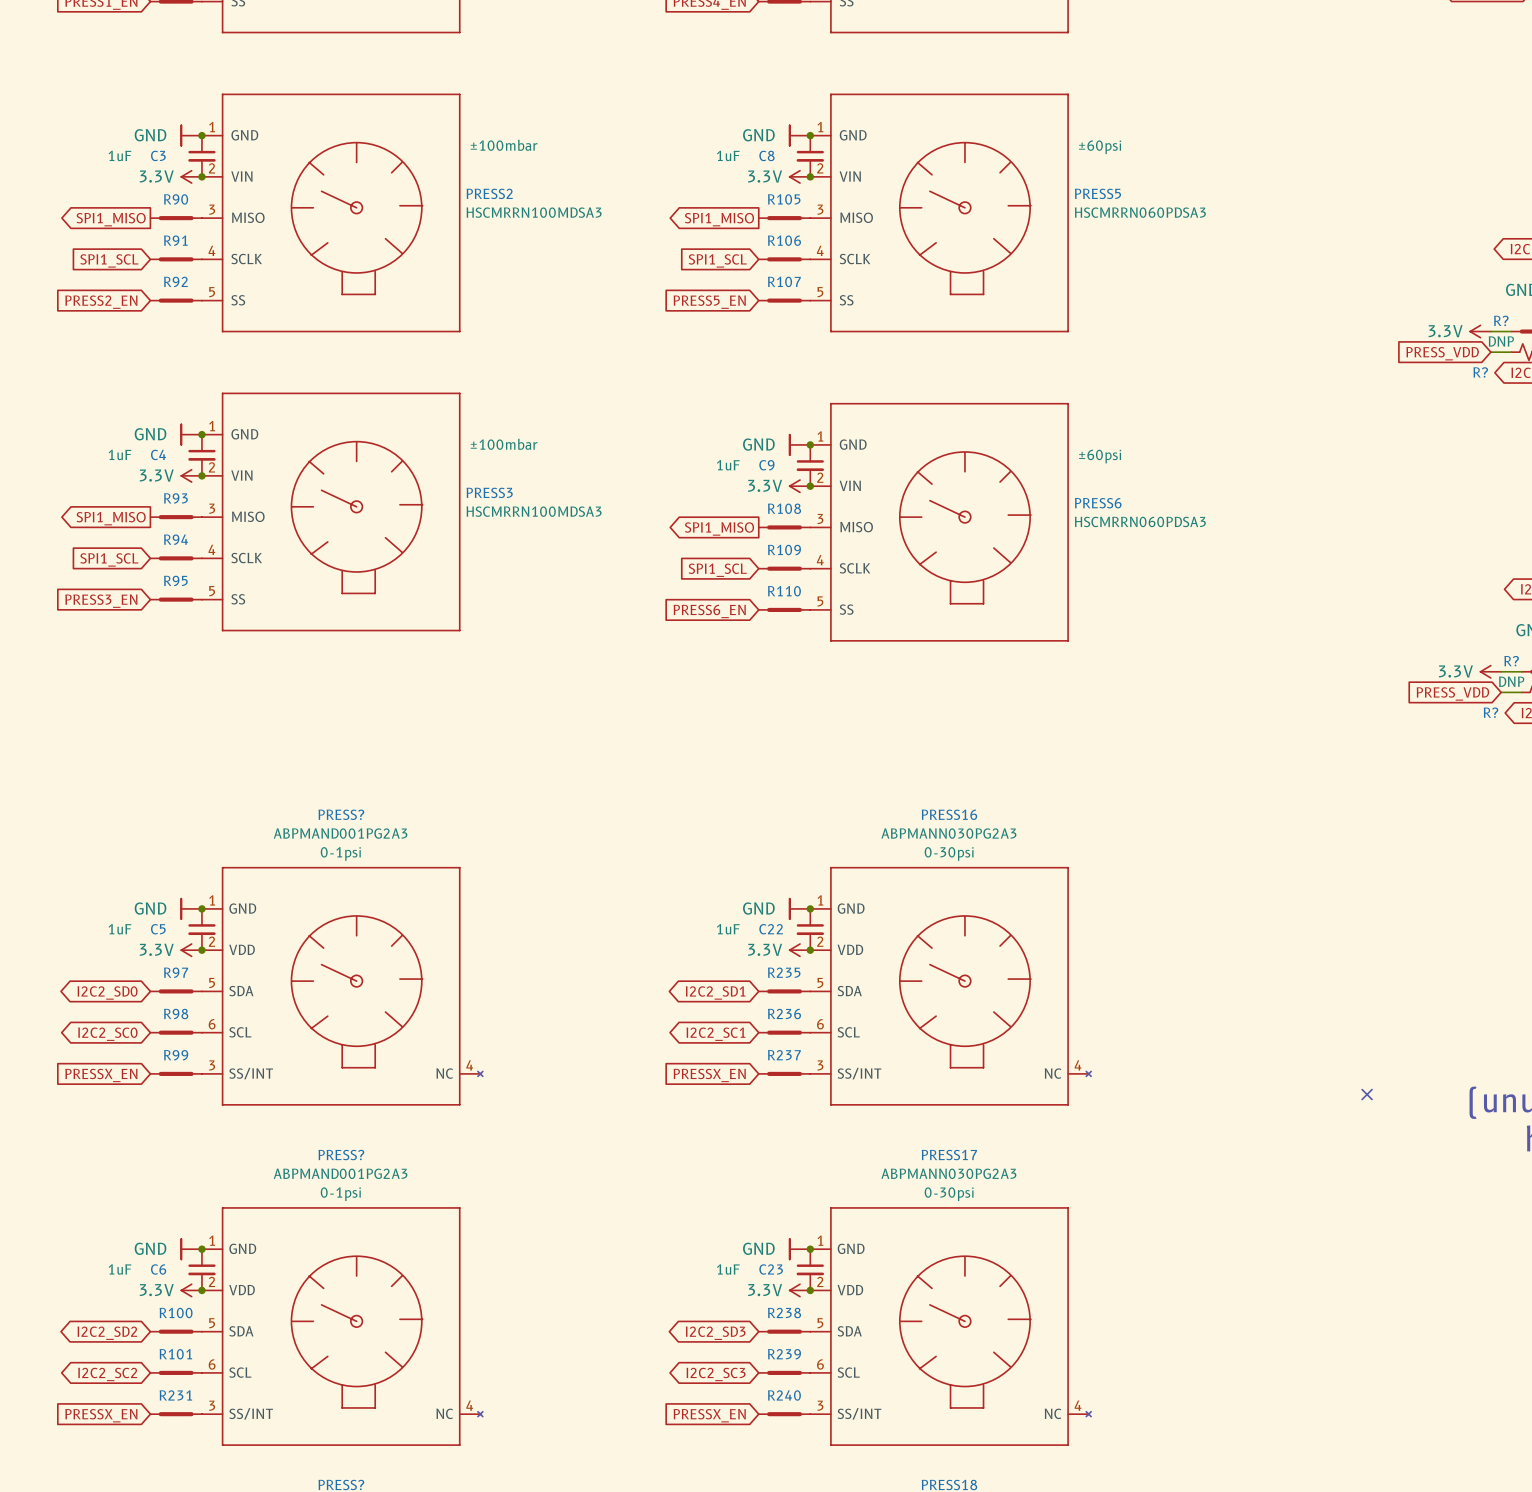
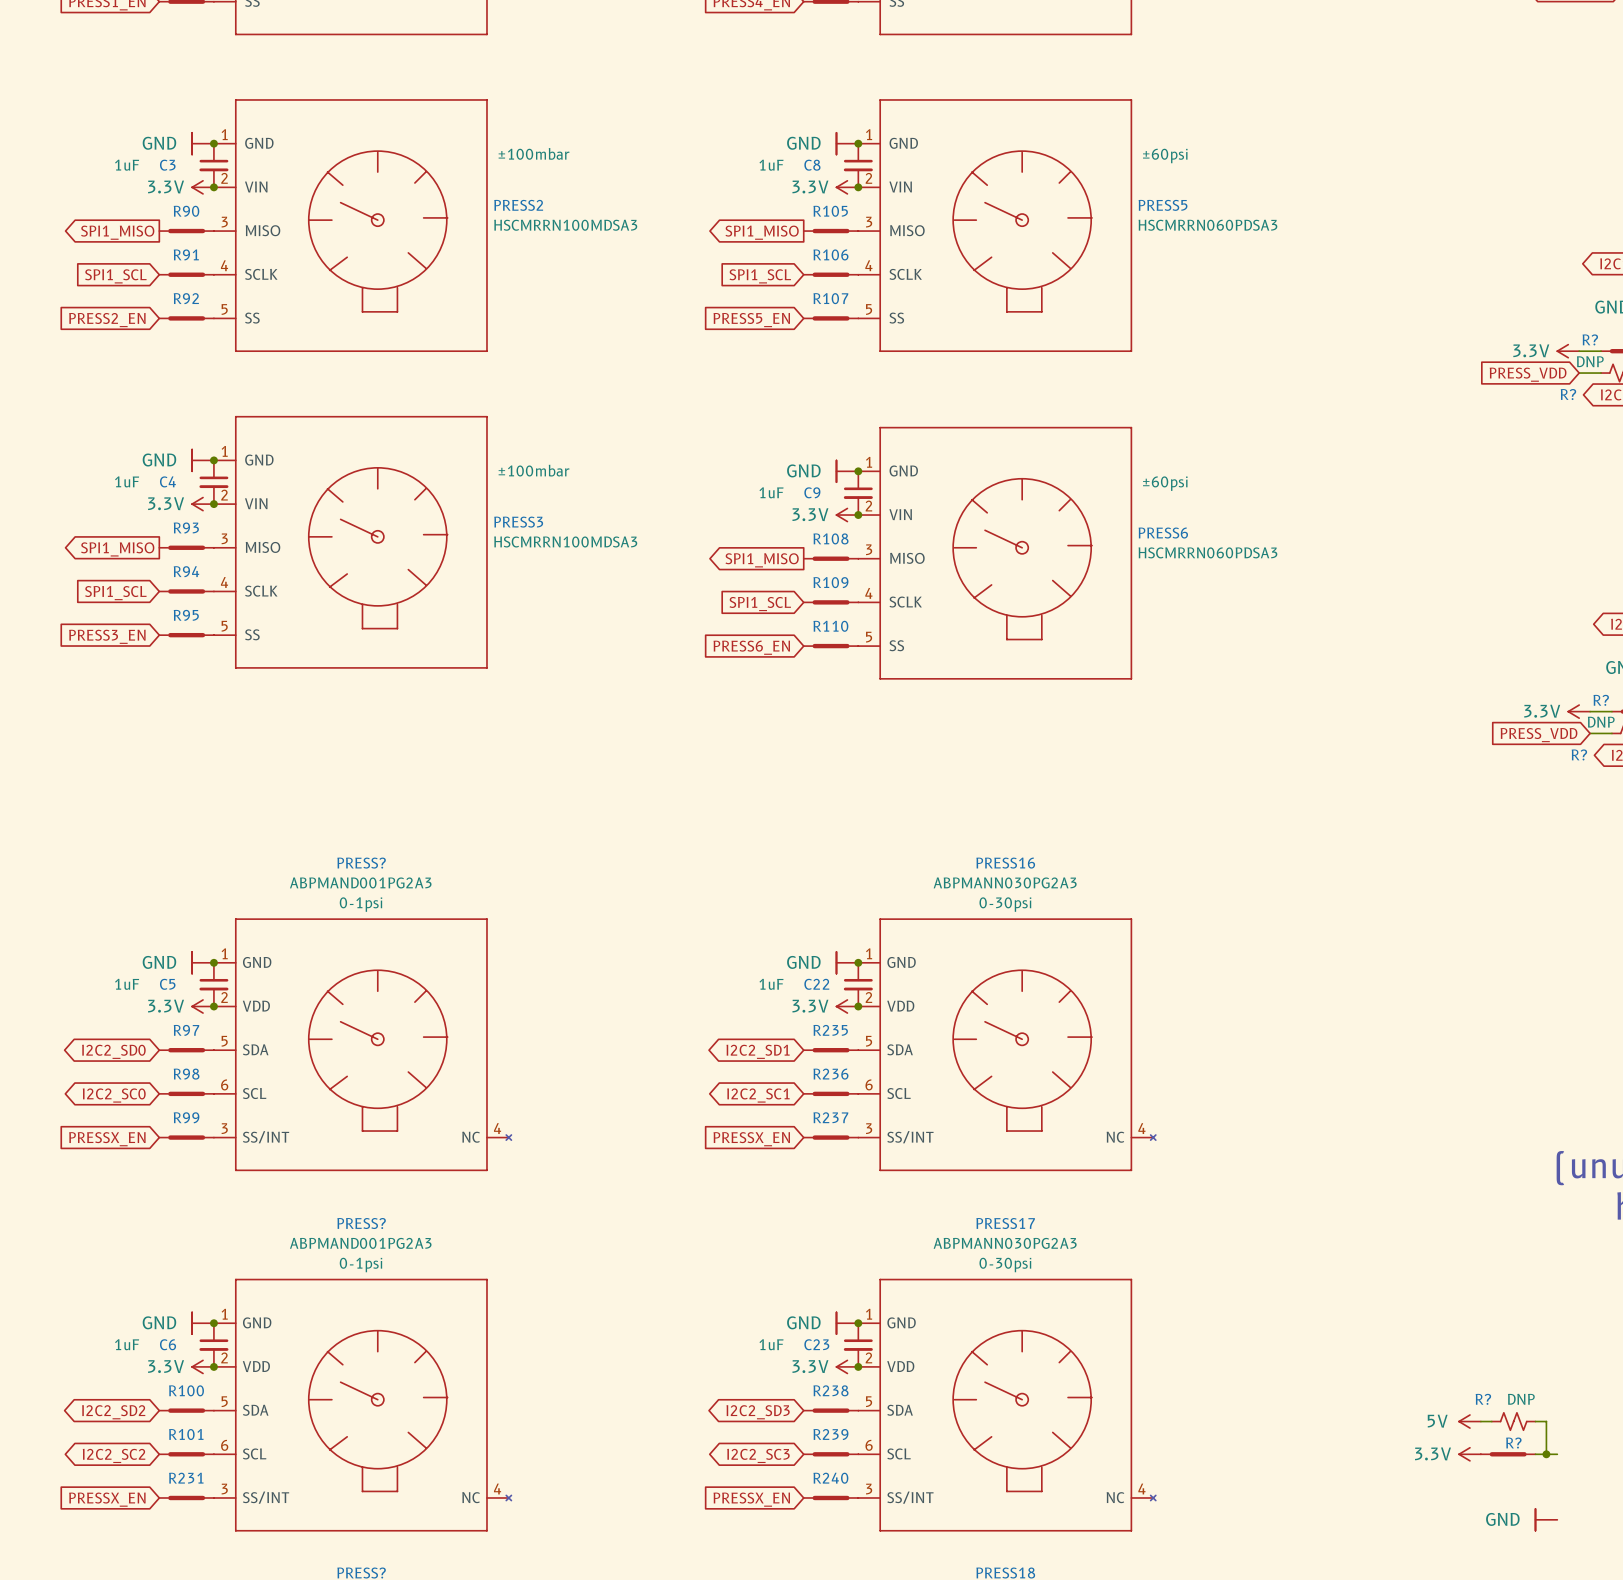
no-connect mark: (1367, 1094) -> none
power symbol: none -> 5V (1469, 1421)
wire: none -> (1480, 1421) (1491, 1421)
R?: none -> (1513, 1421)
wire: none -> (1535, 1421) (1546, 1421) (1546, 1454)
power symbol: none -> 3.3V (1469, 1454)
R?: none -> (1508, 1454)
wire: none -> (1535, 1454) (1557, 1454)
junction: none -> (1546, 1454)
power symbol: none -> GND (1546, 1519)

